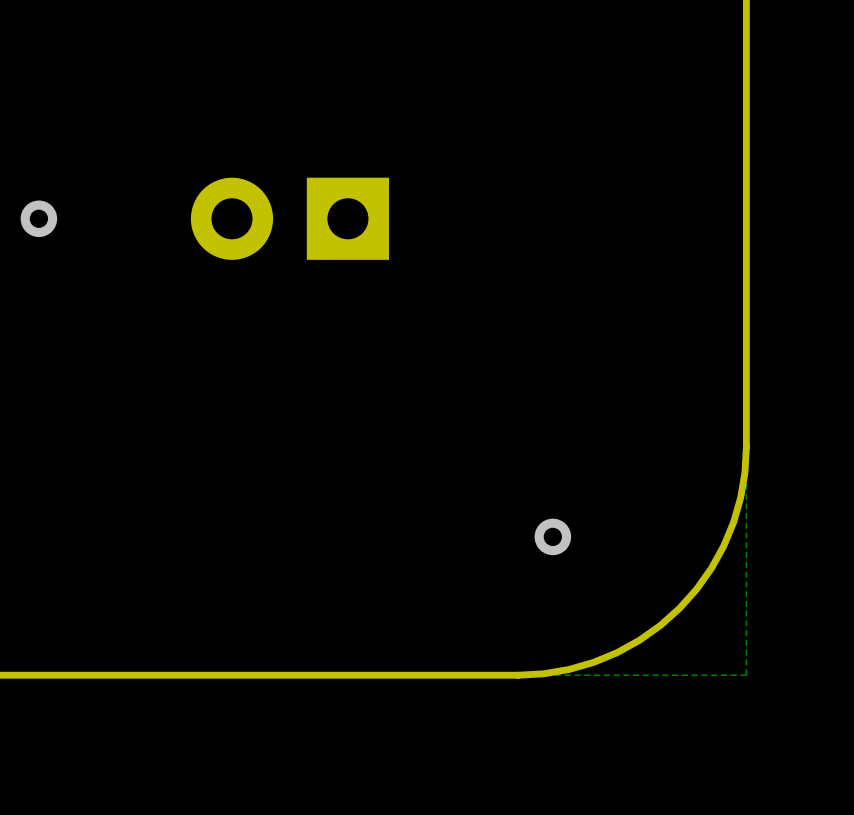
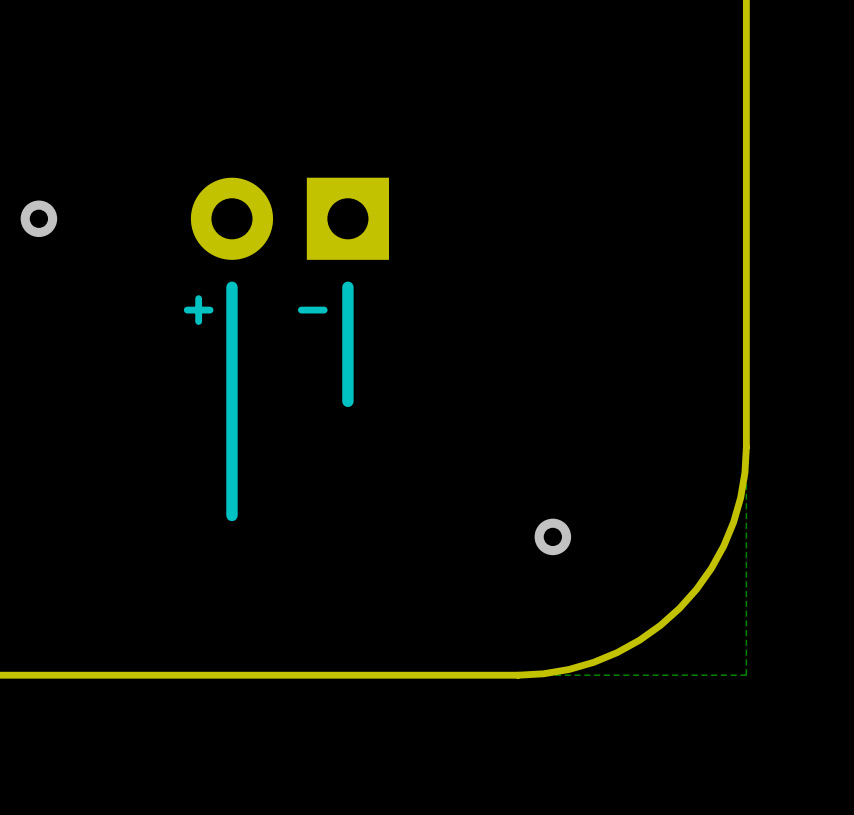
line: none -> (231, 287) (231, 515)
line: none -> (347, 287) (347, 401)
line: none -> (198, 298) (198, 321)
line: none -> (210, 310) (187, 310)
line: none -> (324, 310) (301, 310)

